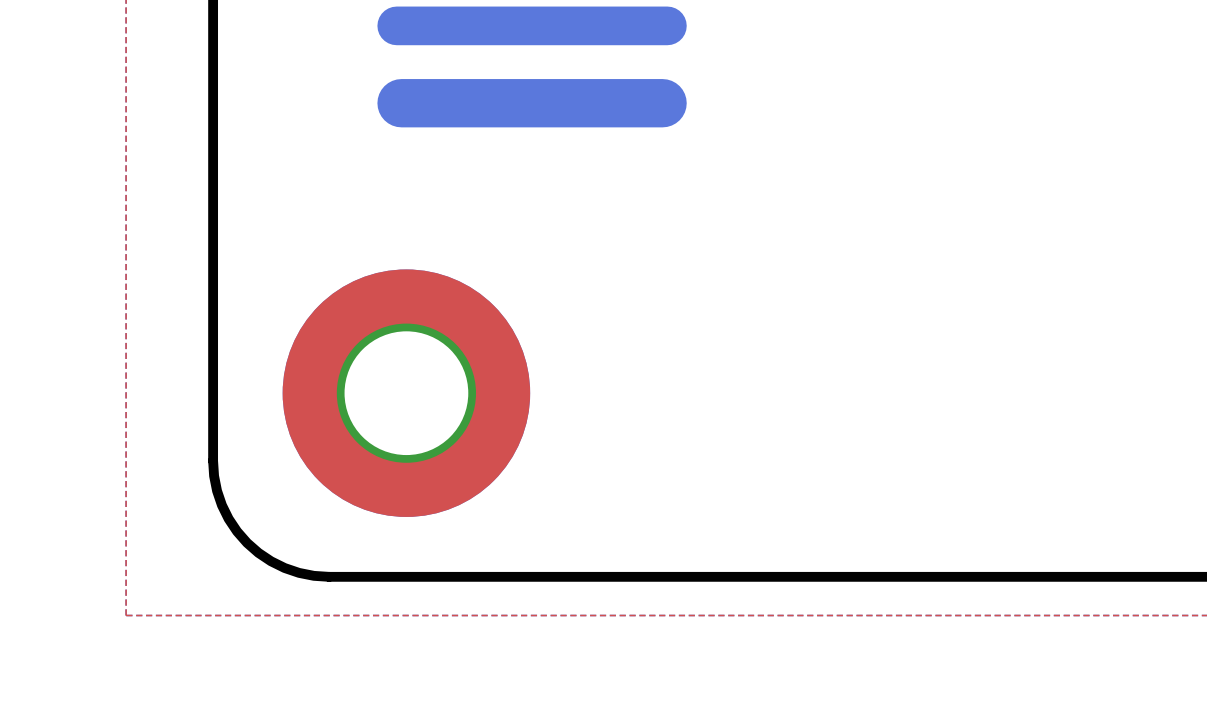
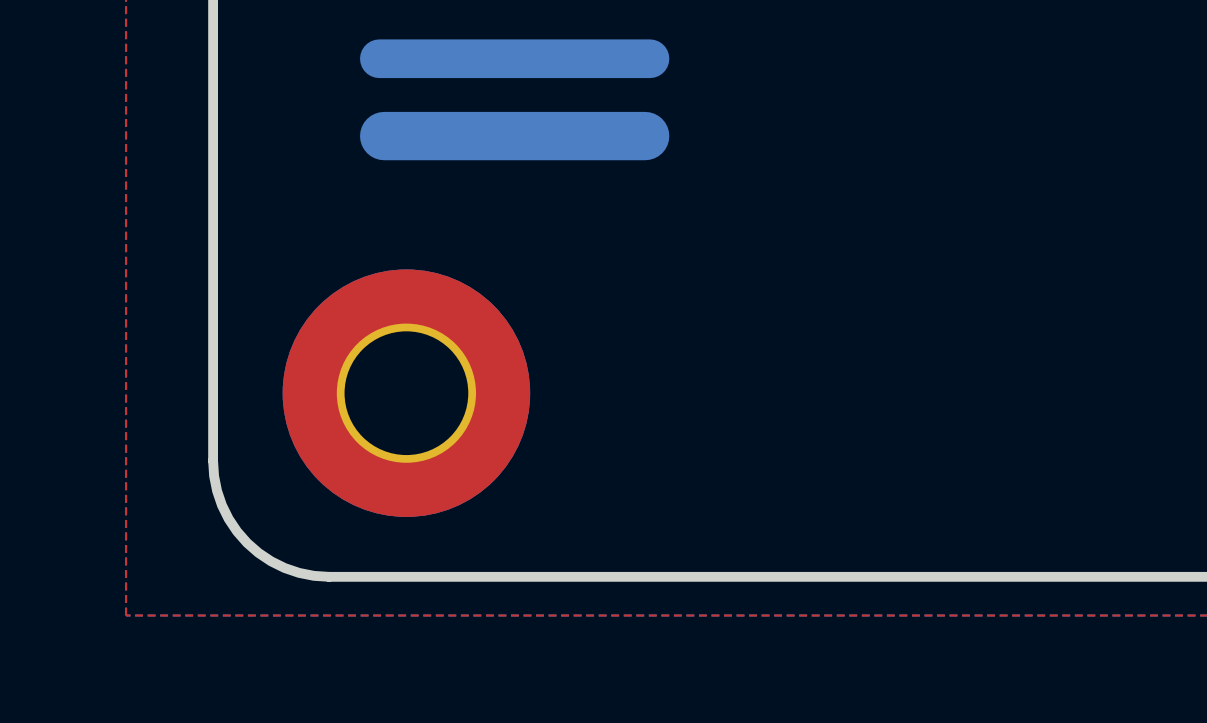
part position: (532, 25) -> (514, 58)
part position: (532, 103) -> (514, 136)

